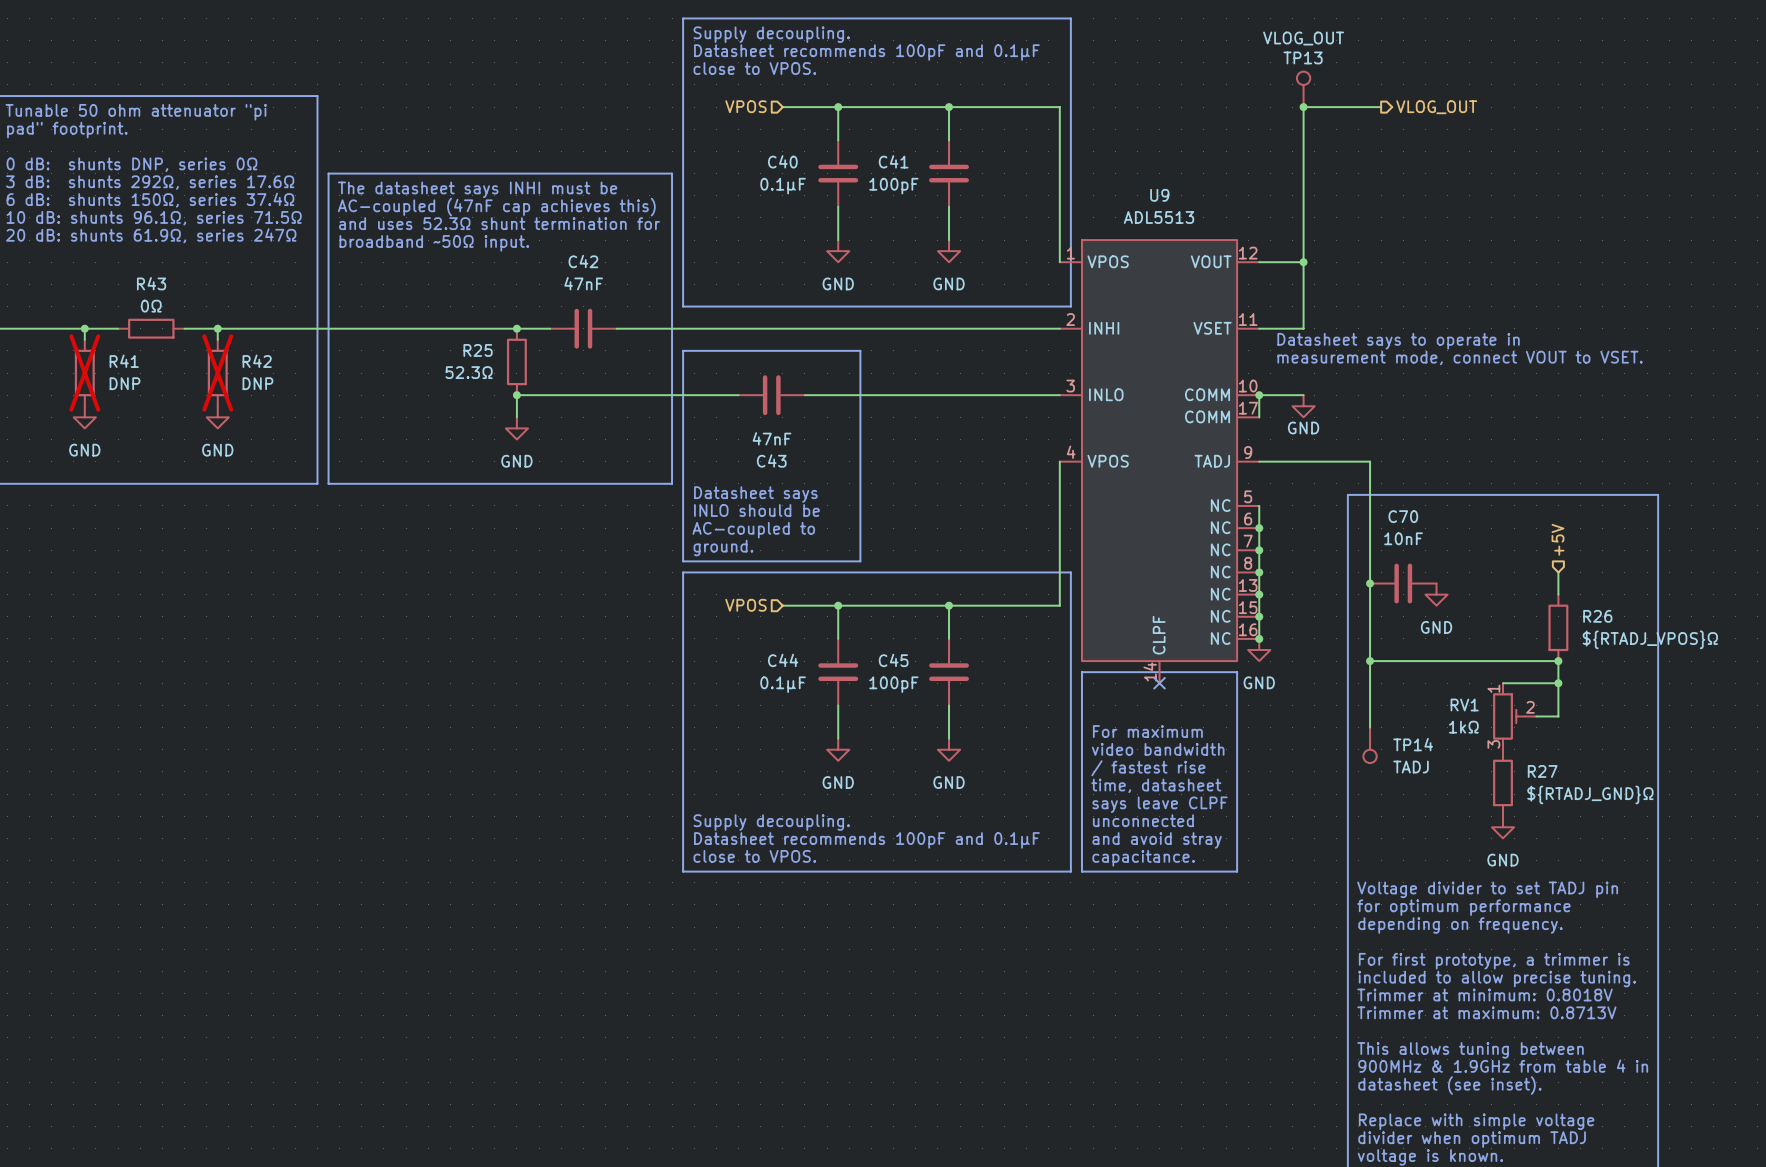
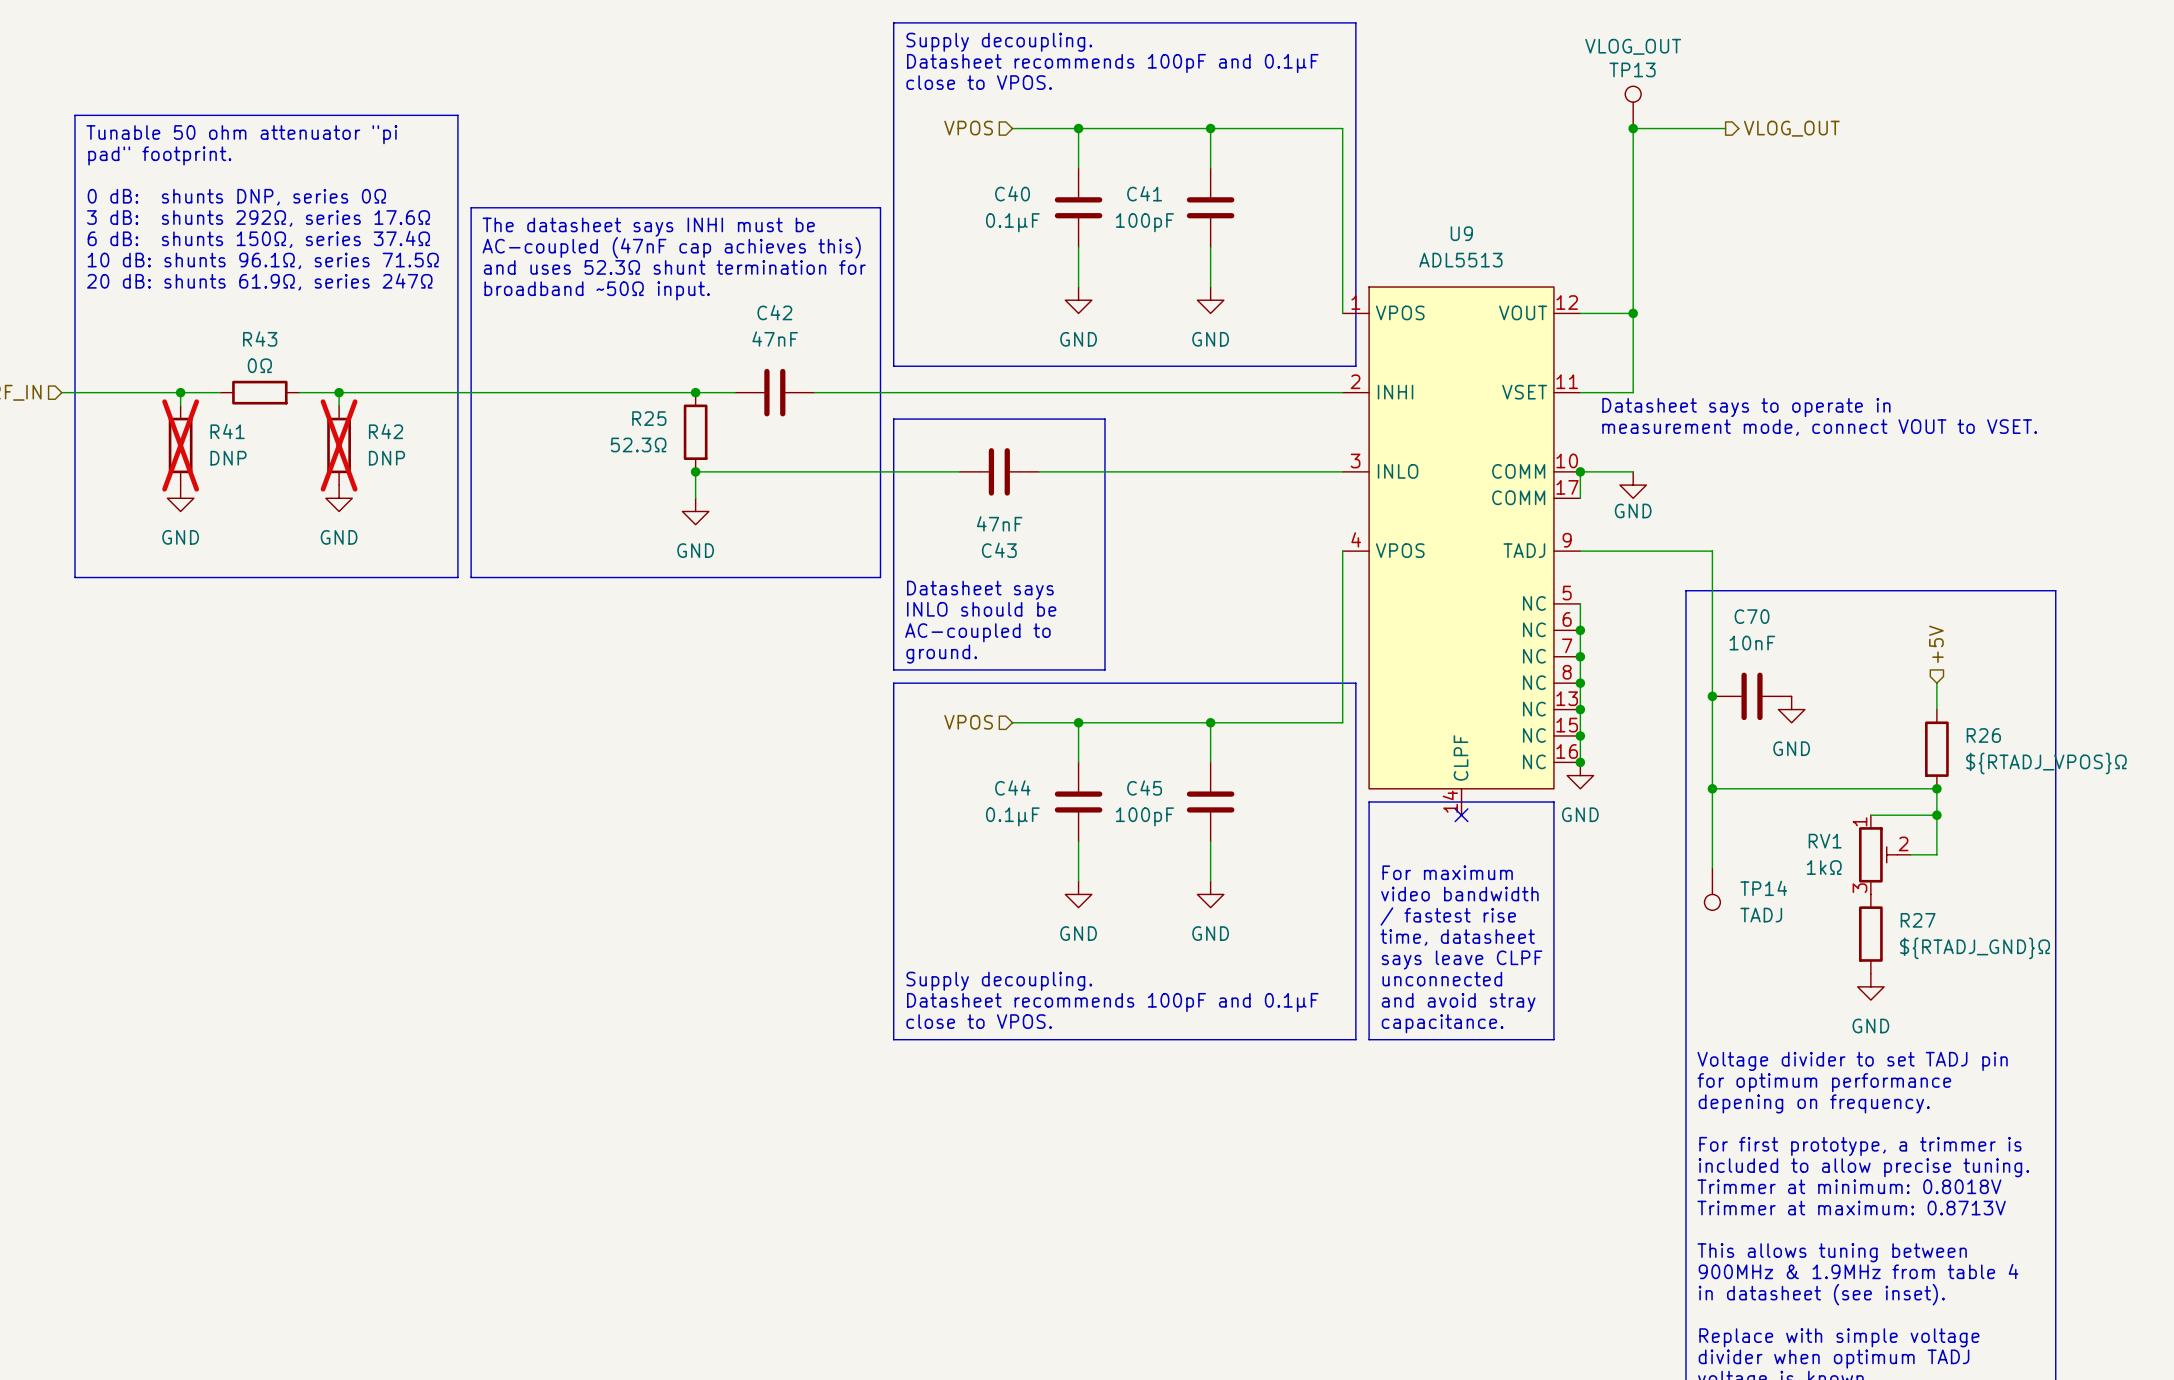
text: depending on frequency. (1460, 925) -> depening on frequency. (1814, 1103)
text: 900MHz & 1.9GHz from table 4 in (1503, 1066) -> 900MHz & 1.9MHz from table 4 (1858, 1271)
text: datasheet (see inset). (1449, 1085) -> in datasheet (see inset). (1821, 1294)

